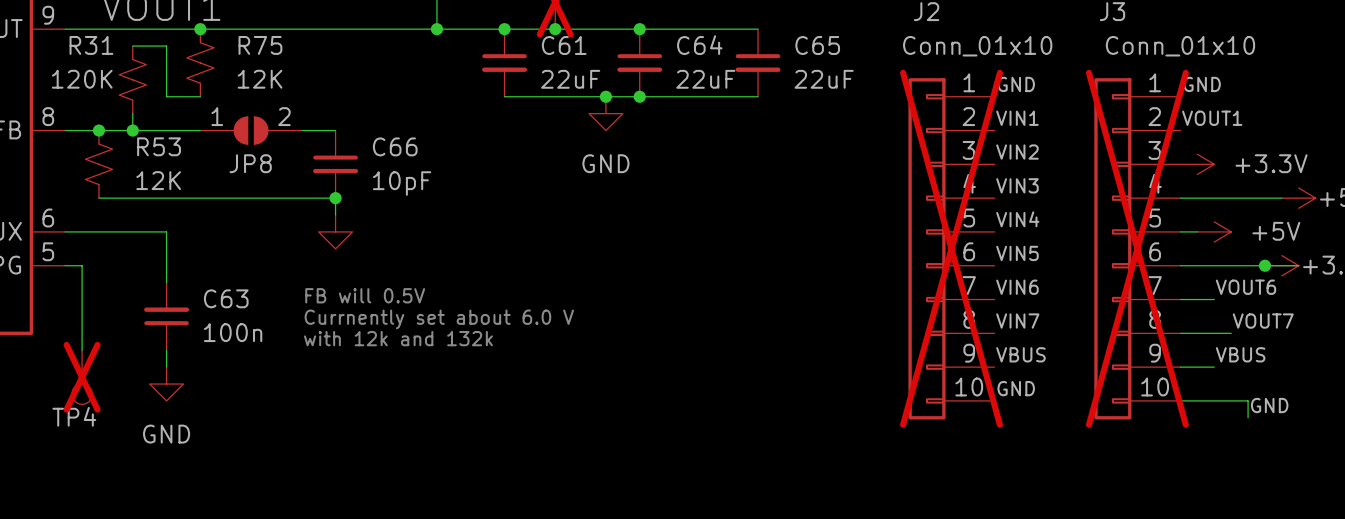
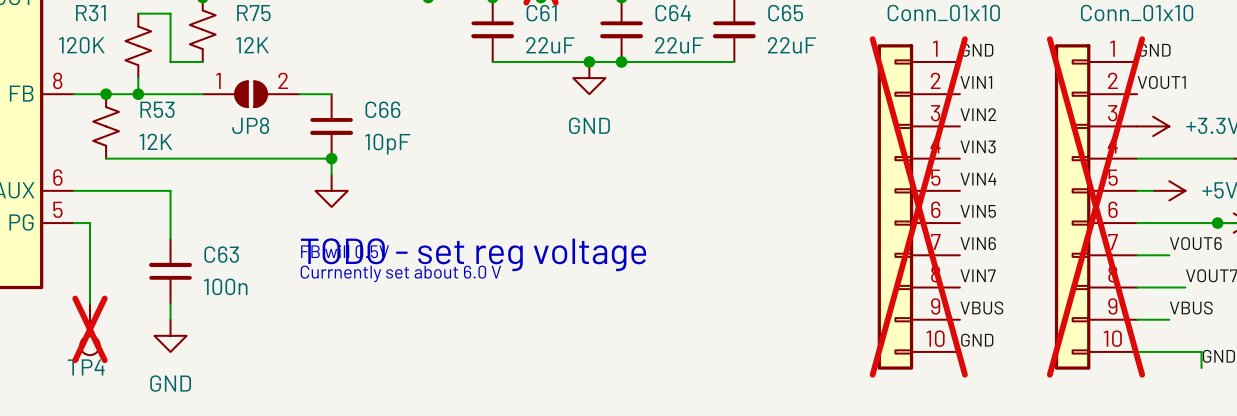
text: none -> TODO - set reg voltage (473, 254)
text: with 12k and 132k (398, 338) -> none

